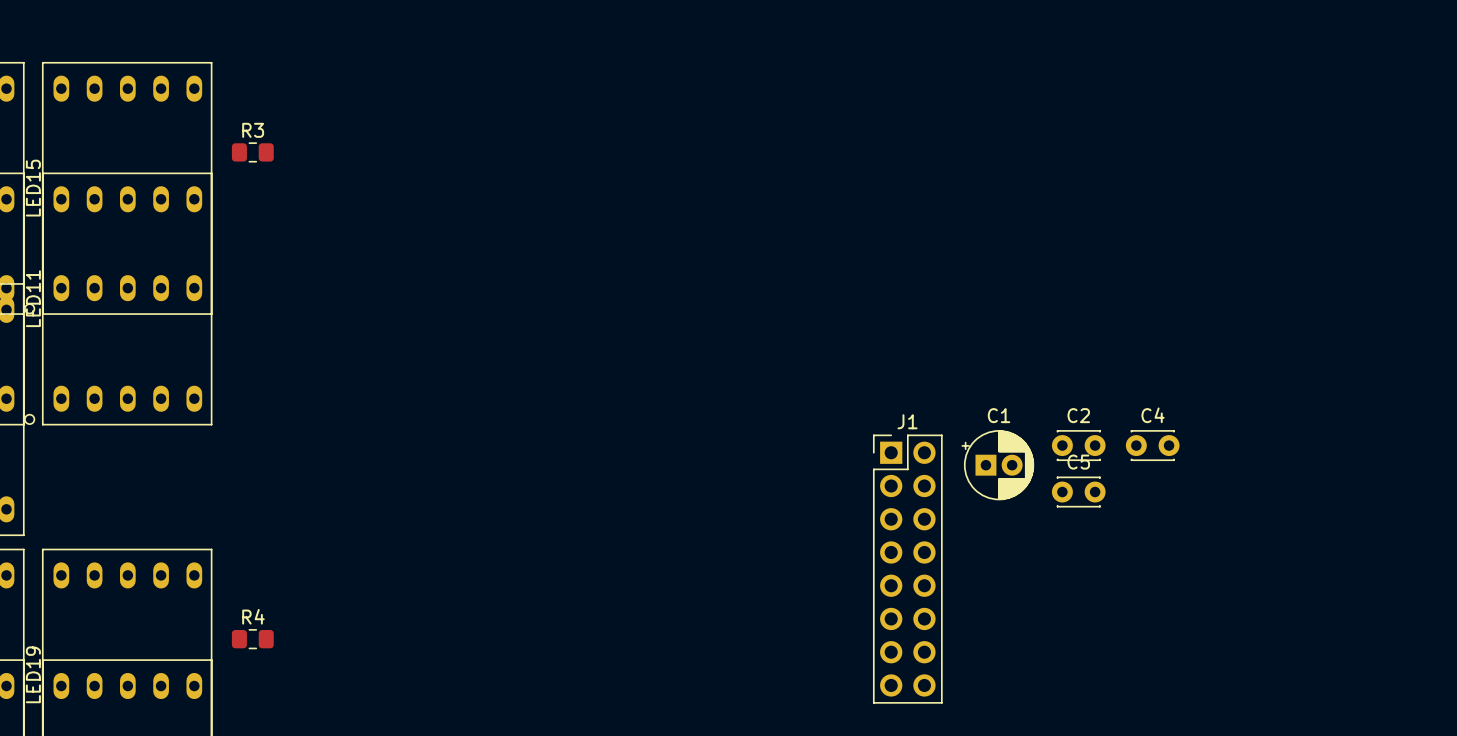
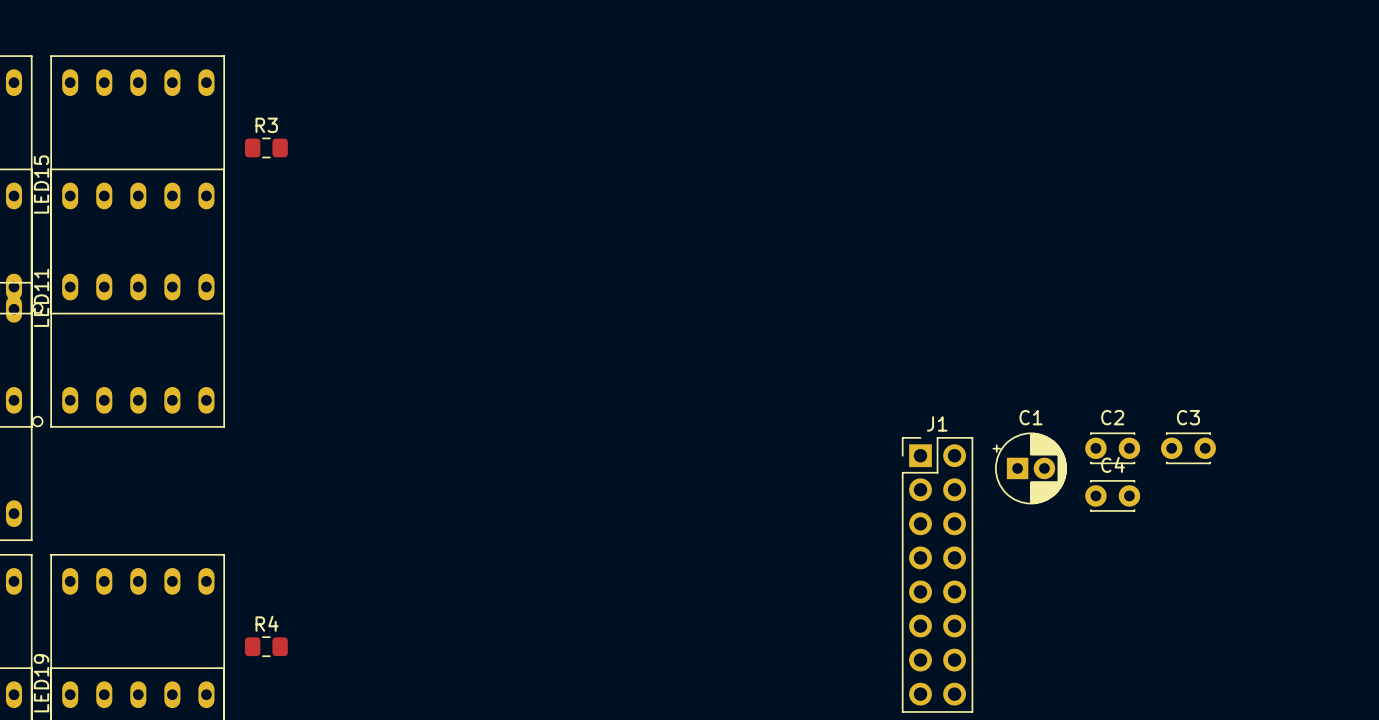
C4 name: C4 (1153, 415) -> C3 (1188, 417)
C5 name: C5 (1078, 462) -> C4 (1113, 464)

